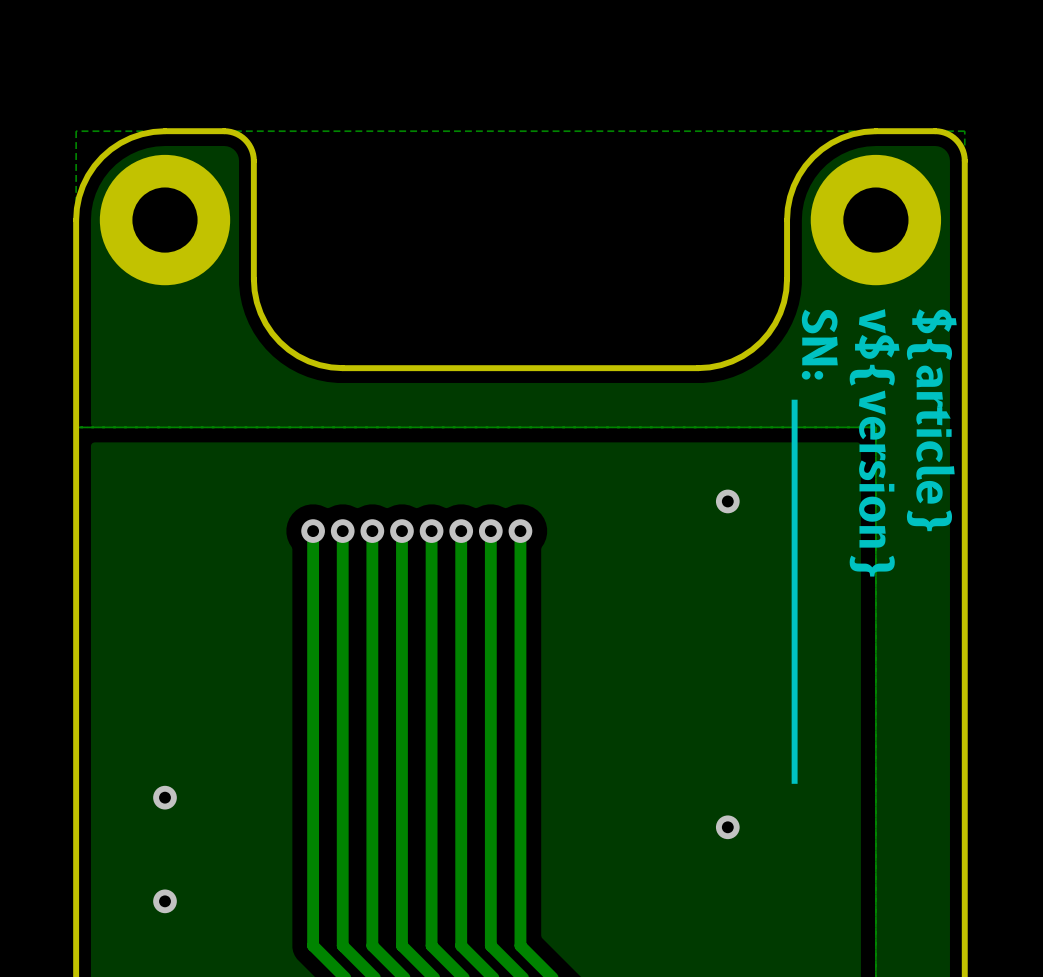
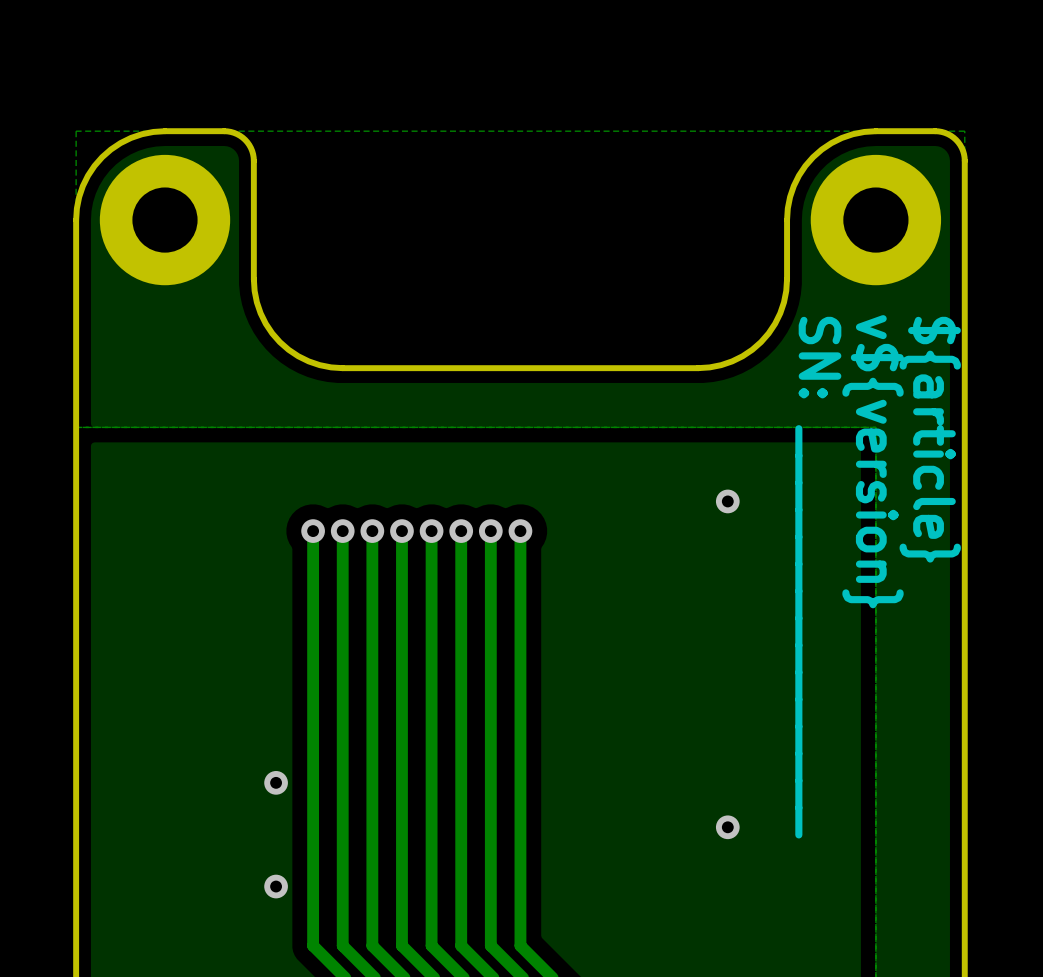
via: none -> (276, 782)
via: (164, 797) -> none
via: none -> (276, 886)
via: (164, 901) -> none

